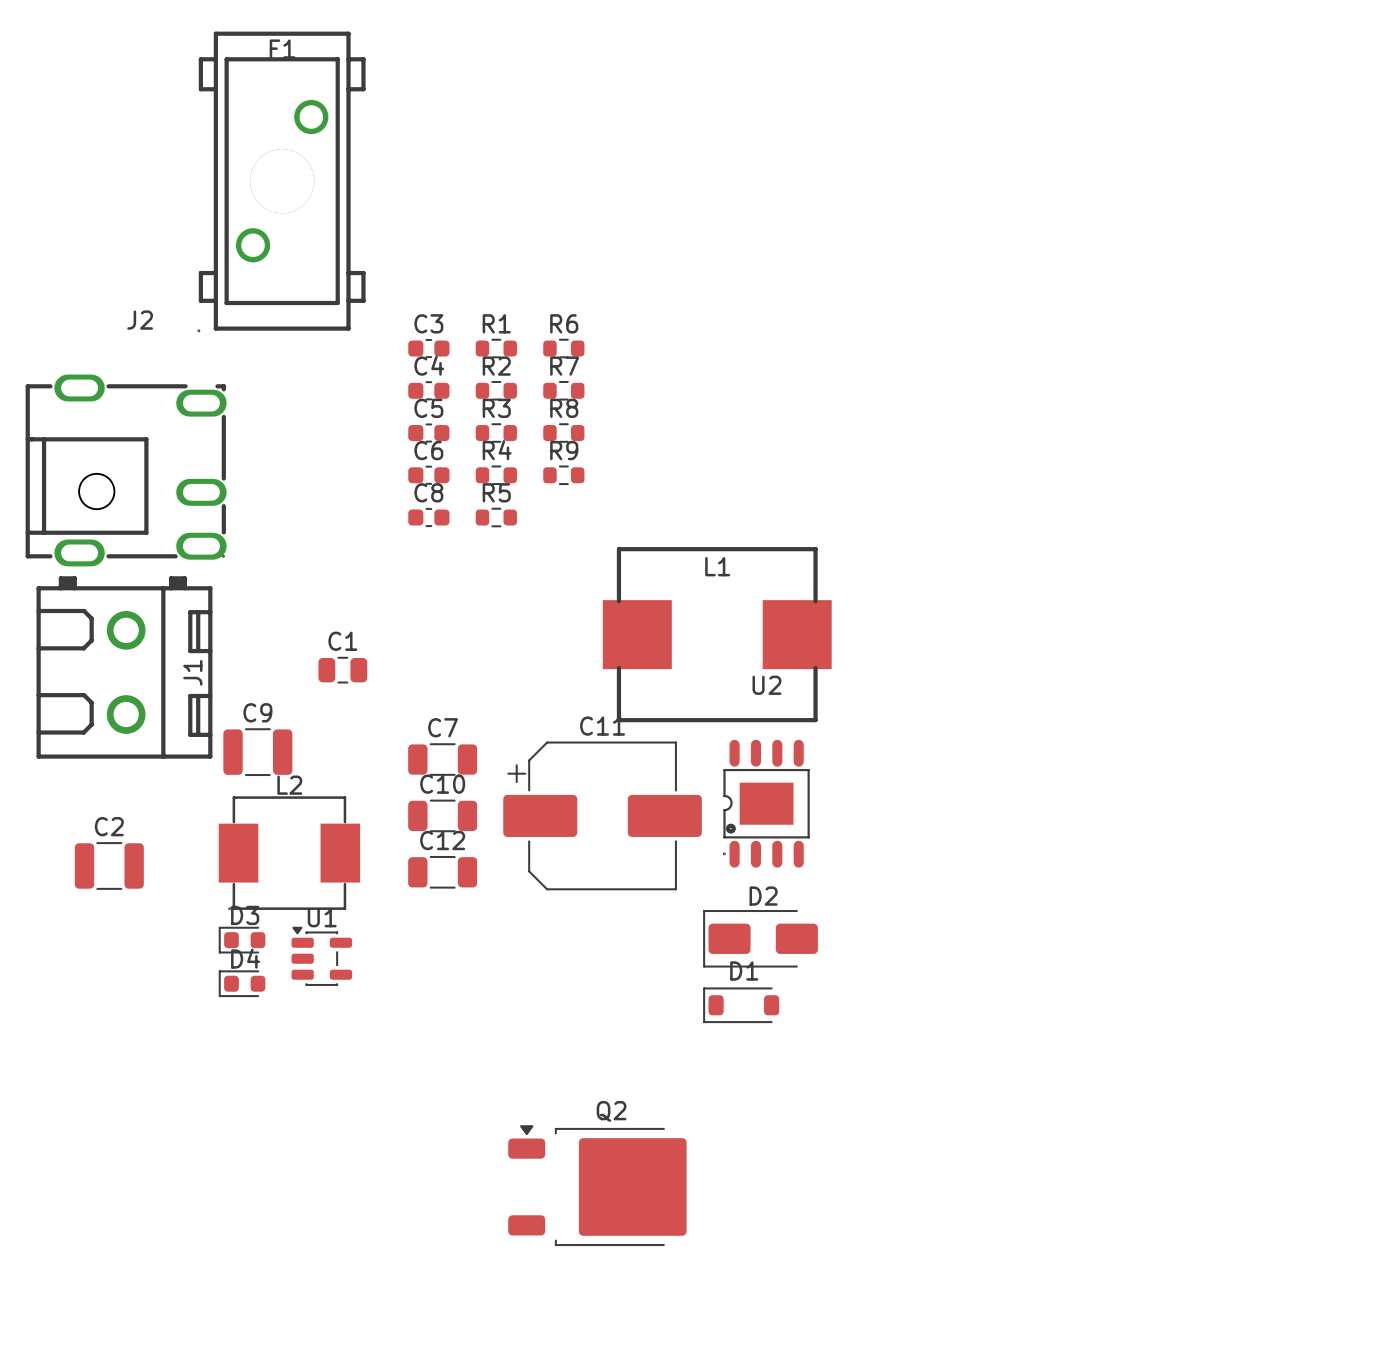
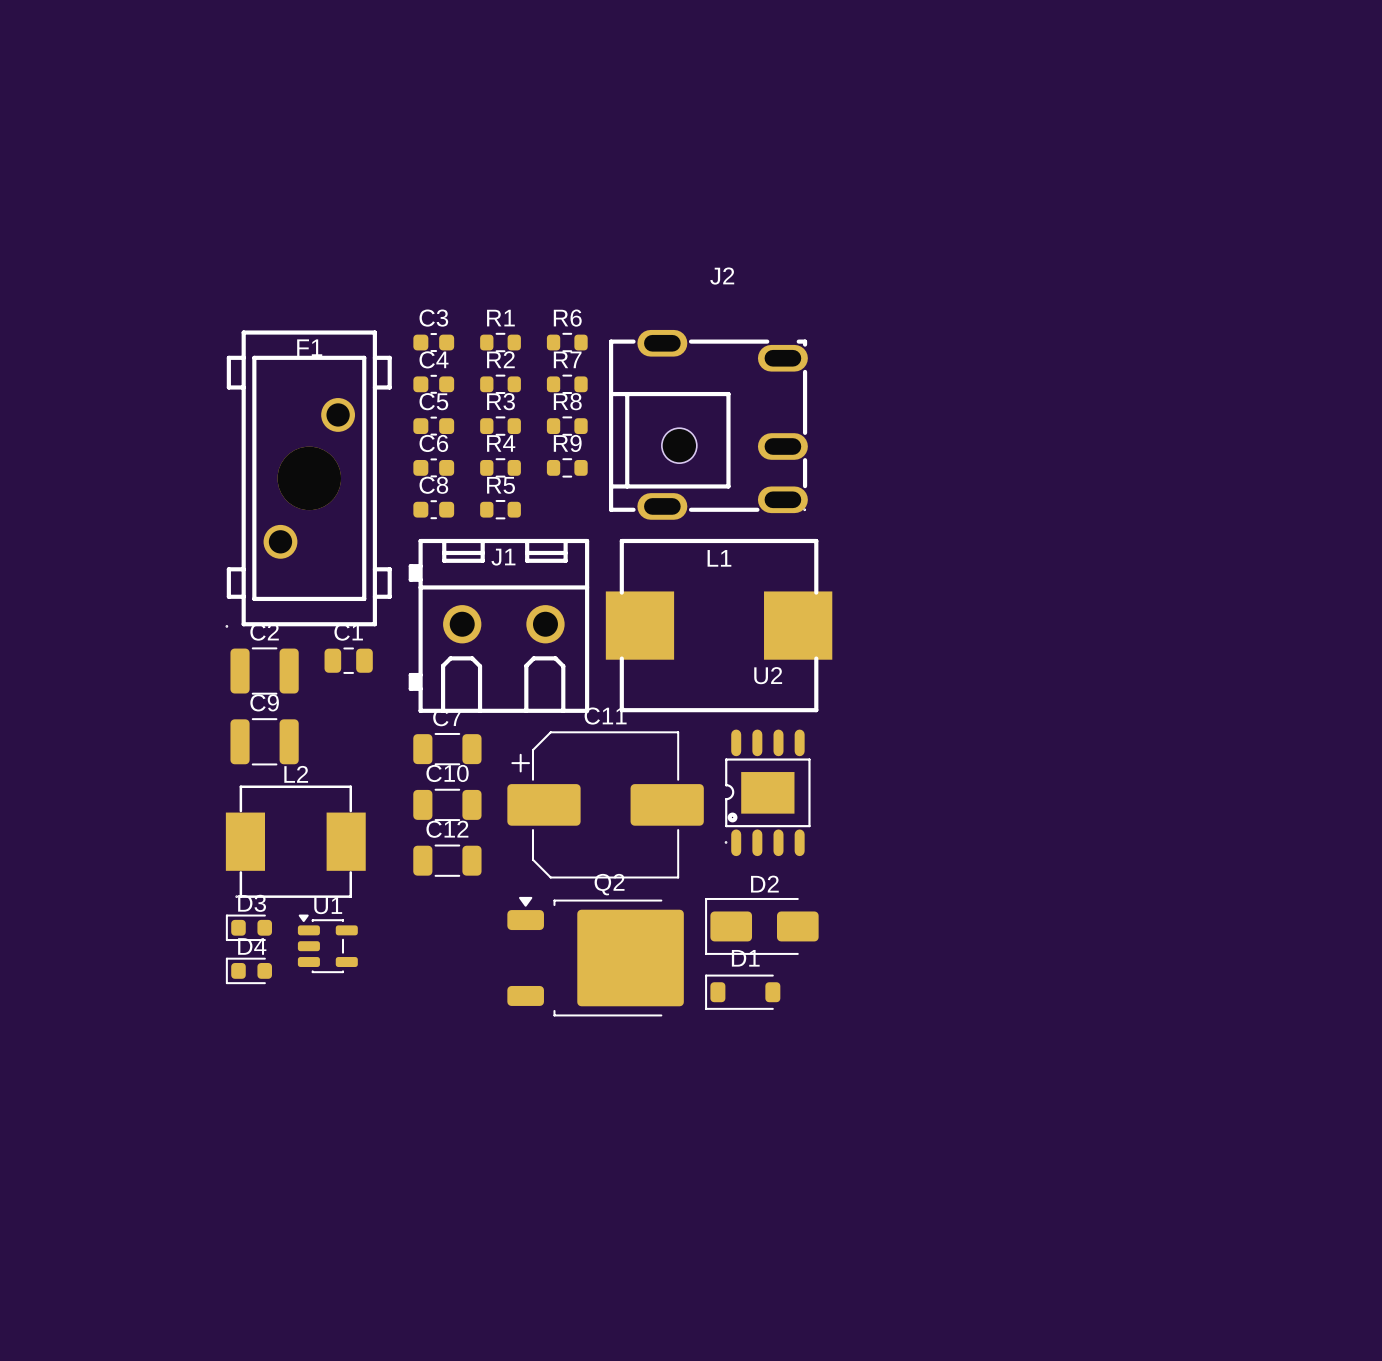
F1 position: (281, 181) -> (308, 478)
J2 position: (126, 470) -> (708, 424)
J1 rotation: 0° (124, 667) -> 90° counterclockwise (498, 625)
J1 position: (124, 667) -> (498, 625)
C2 position: (109, 865) -> (264, 671)
Q2 position: (597, 1185) -> (595, 956)

